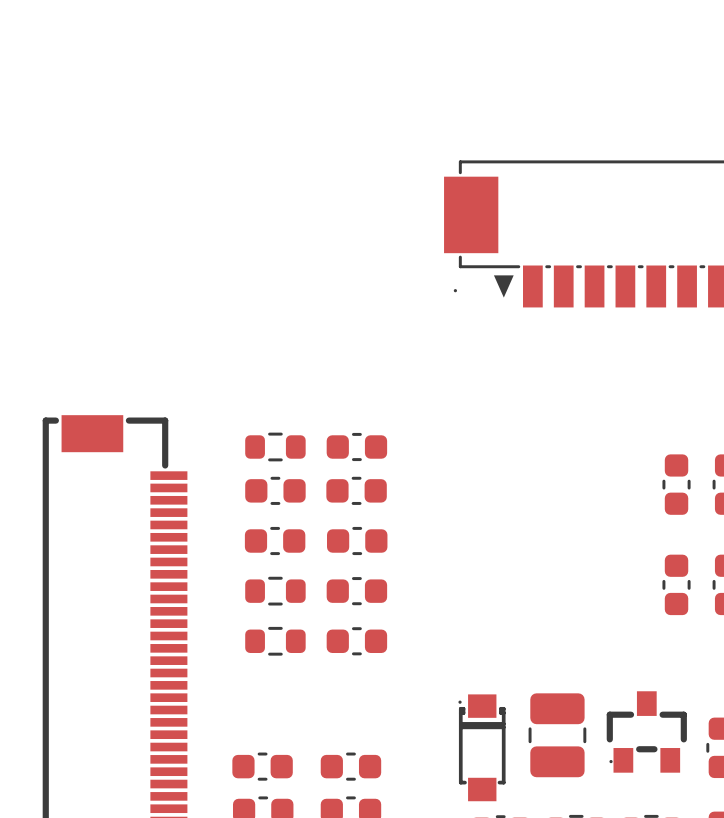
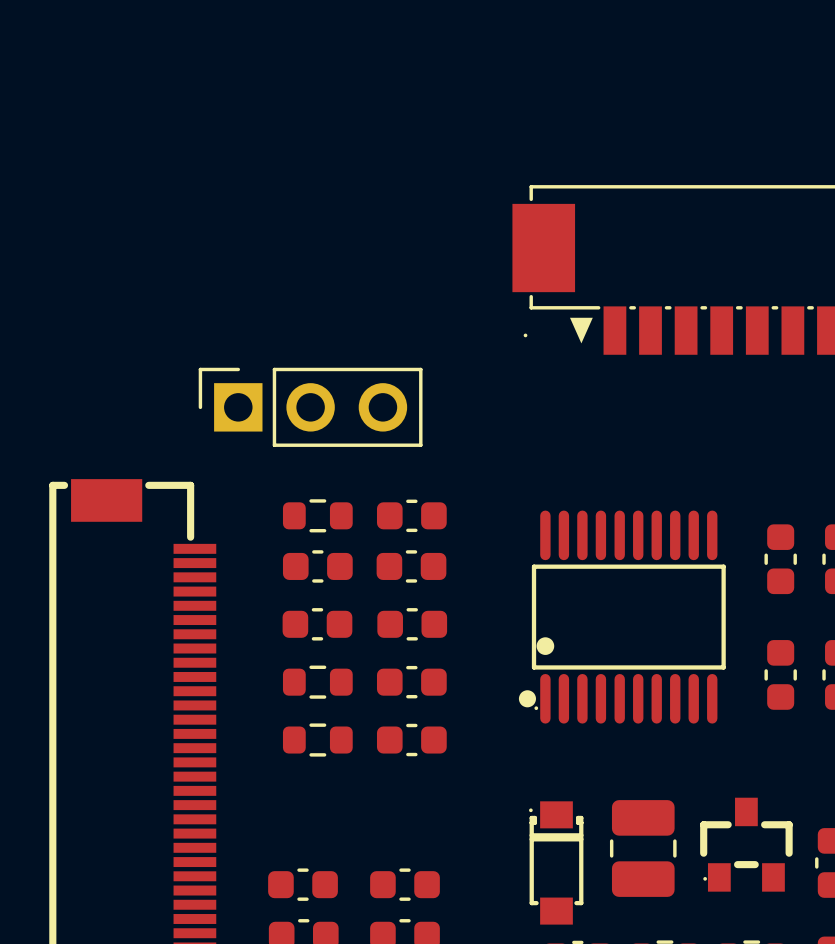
part: none -> (310, 407)
part: none -> (622, 617)

